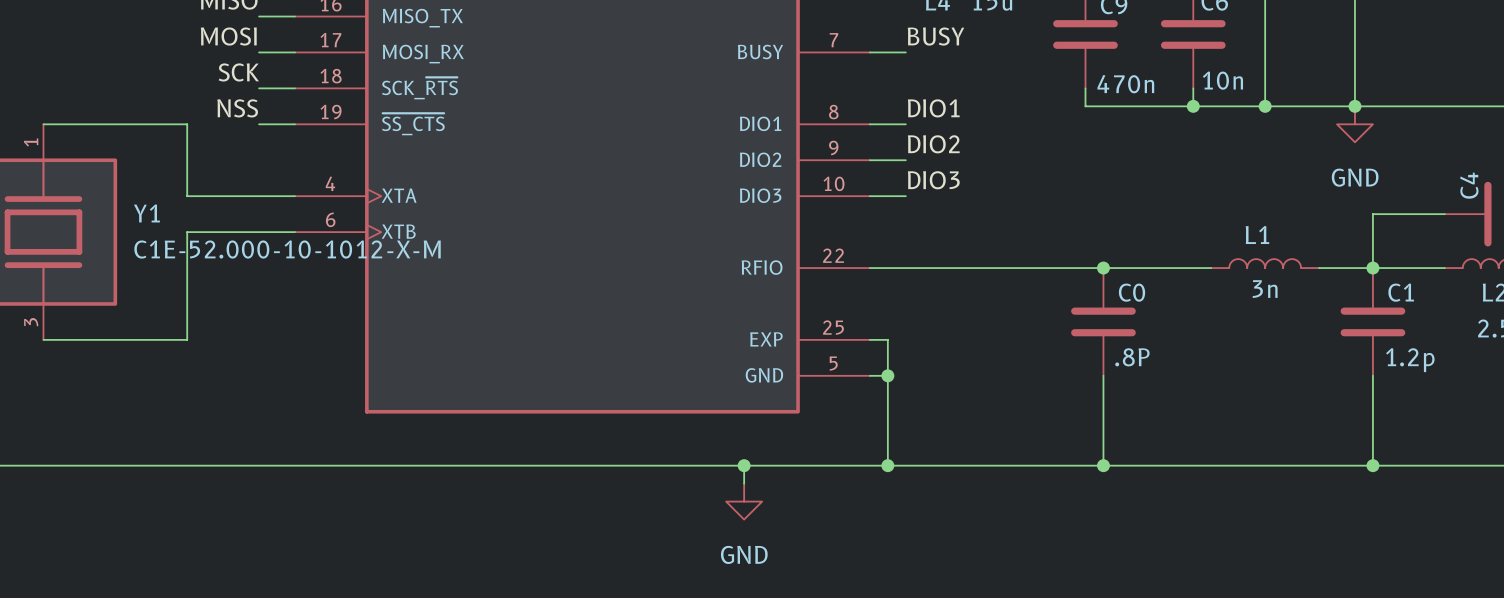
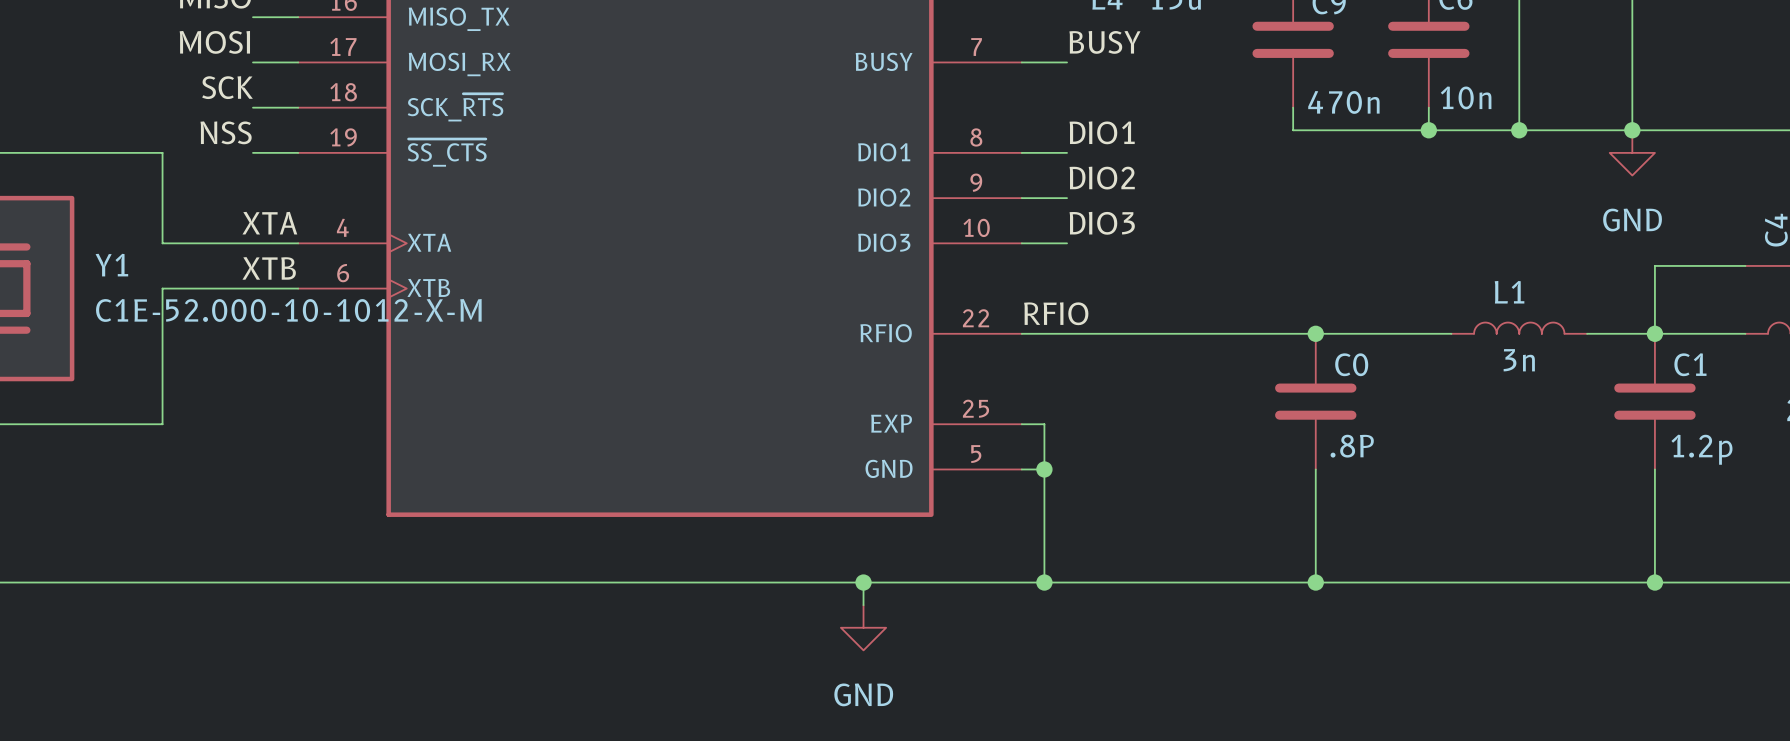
label: none -> XTA (269, 223)
label: none -> XTB (269, 268)
label: none -> RFIO (1056, 313)

